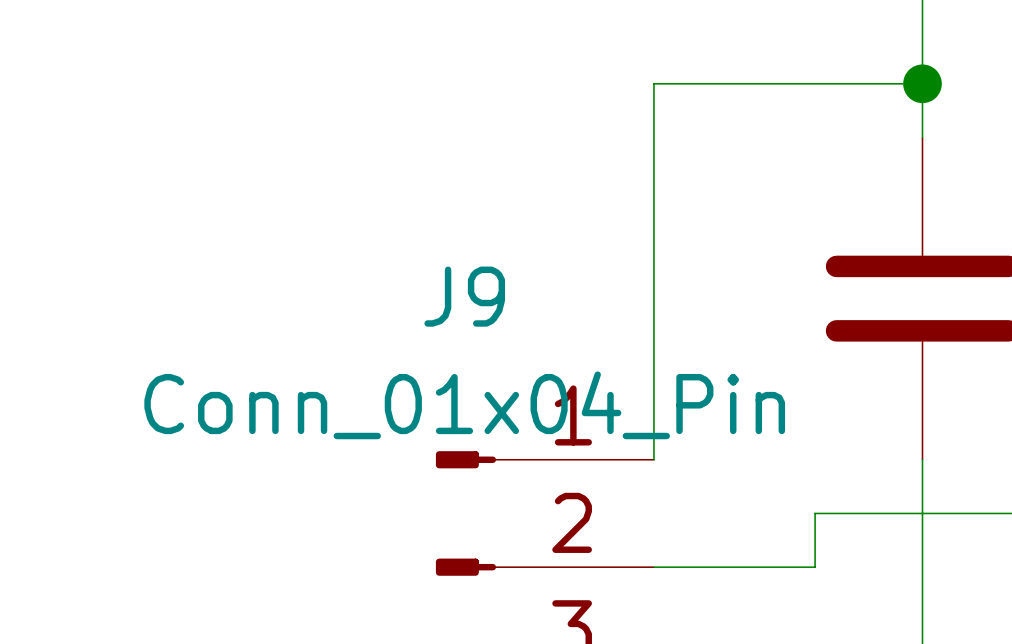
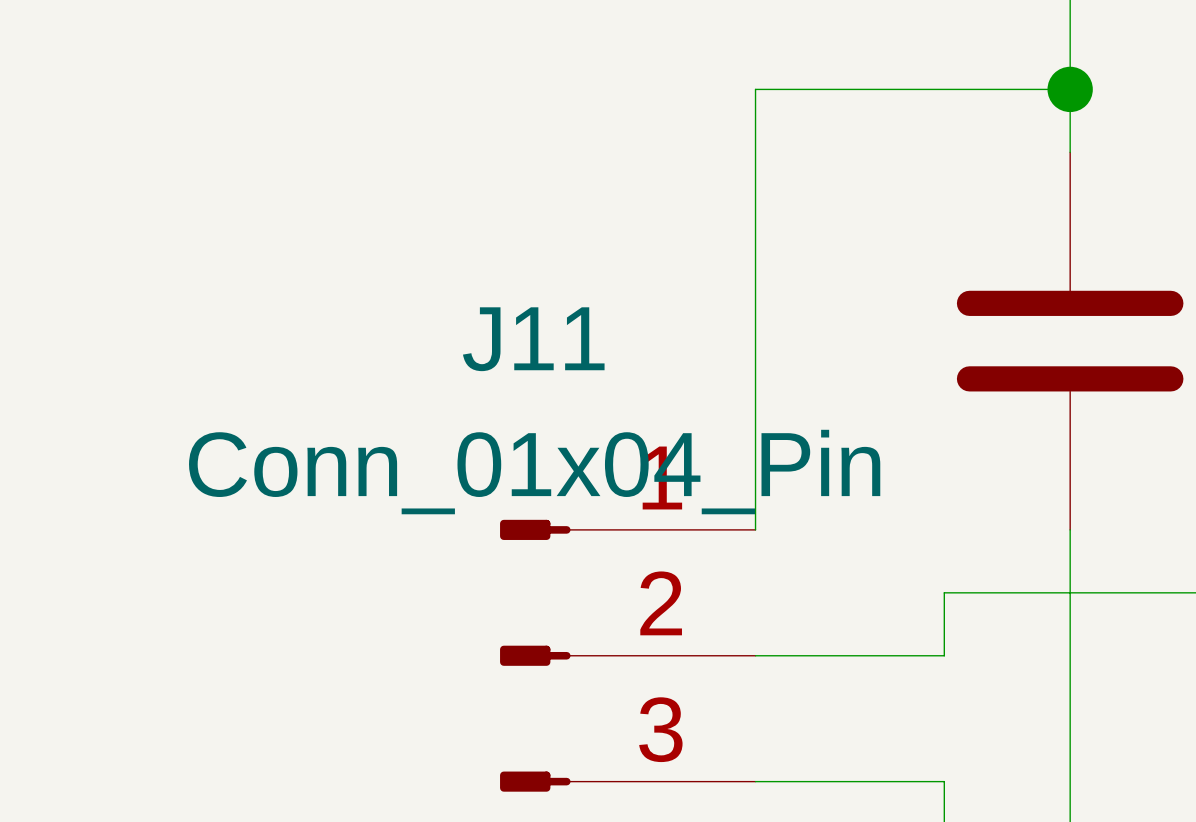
J9 name: J9 (464, 296) -> J11 (533, 339)

